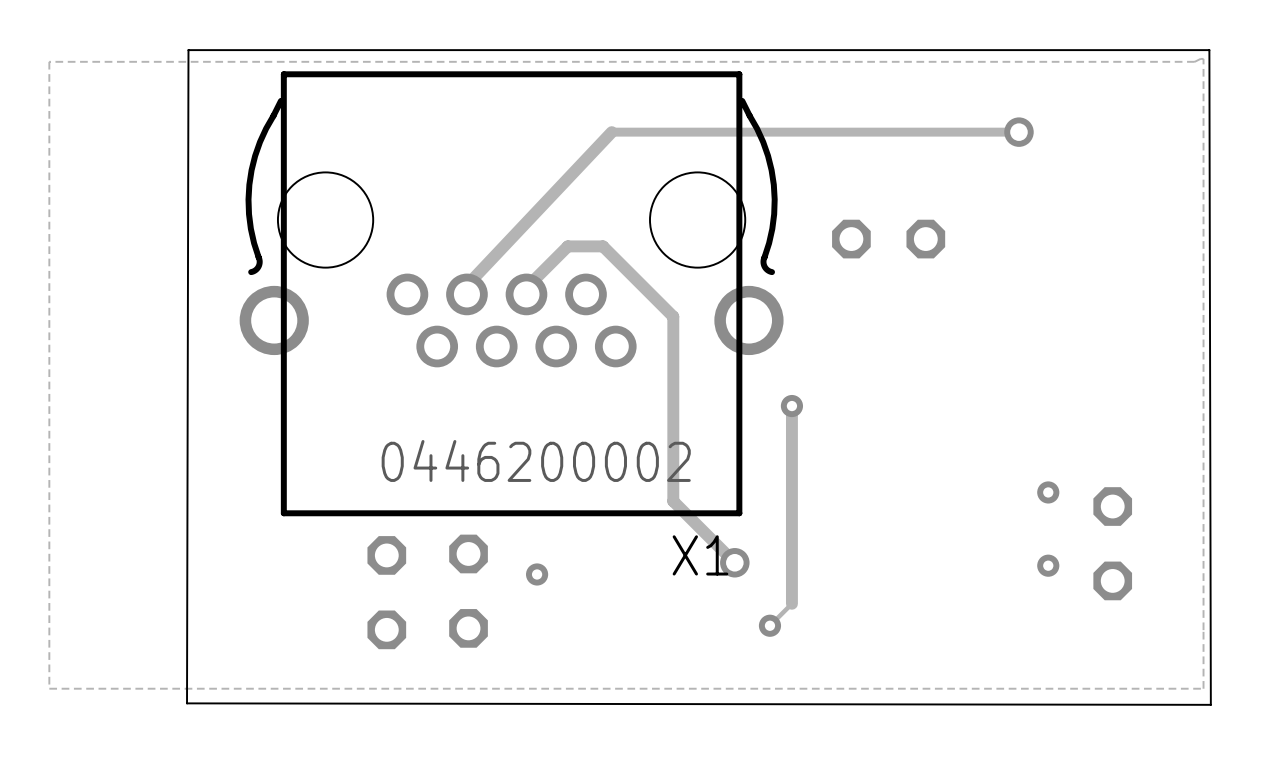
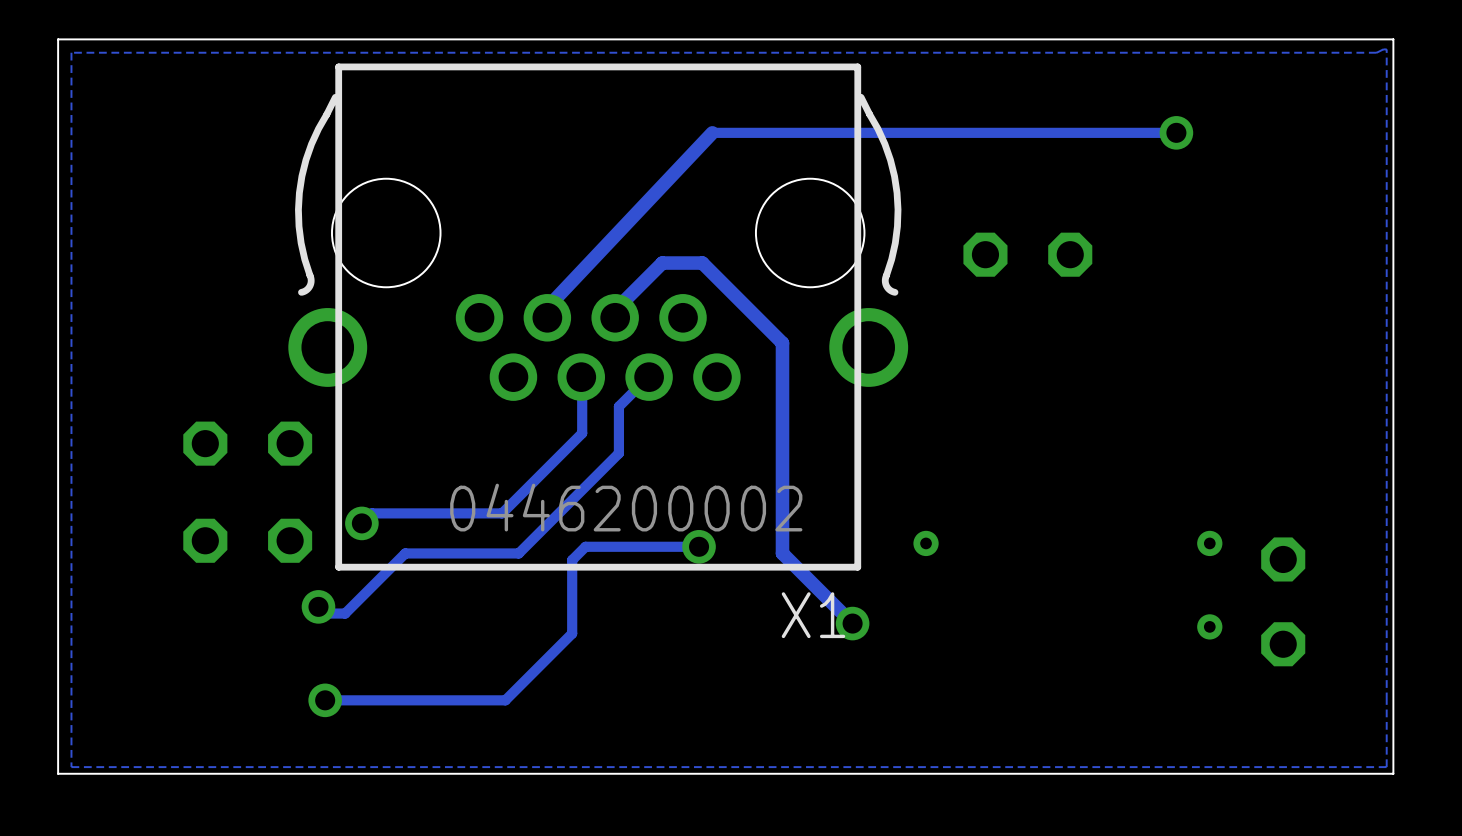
board edge: (1209, 50) (1210, 704) (187, 703) (188, 50) -> (1393, 39) (1393, 773) (58, 773) (58, 39) (230, 39)
track: none -> (581, 377) (582, 433) (502, 513) (371, 513) (361, 523)
track: none -> (649, 377) (618, 406) (618, 453) (518, 553) (405, 553) (345, 613) (318, 613) (318, 606)
part: none -> (247, 443)
track: (791, 406) (791, 603) (769, 625) -> none
via: (791, 406) -> none
via: none -> (361, 523)
part: none -> (247, 540)
via: none -> (926, 543)
track: none -> (699, 546) (585, 546) (572, 560) (572, 633) (505, 700) (325, 700)
via: none -> (699, 546)
via: none -> (318, 606)
via: (537, 574) -> none
part: (468, 591) -> none
part: (386, 592) -> none
via: (769, 625) -> none
via: none -> (325, 700)

